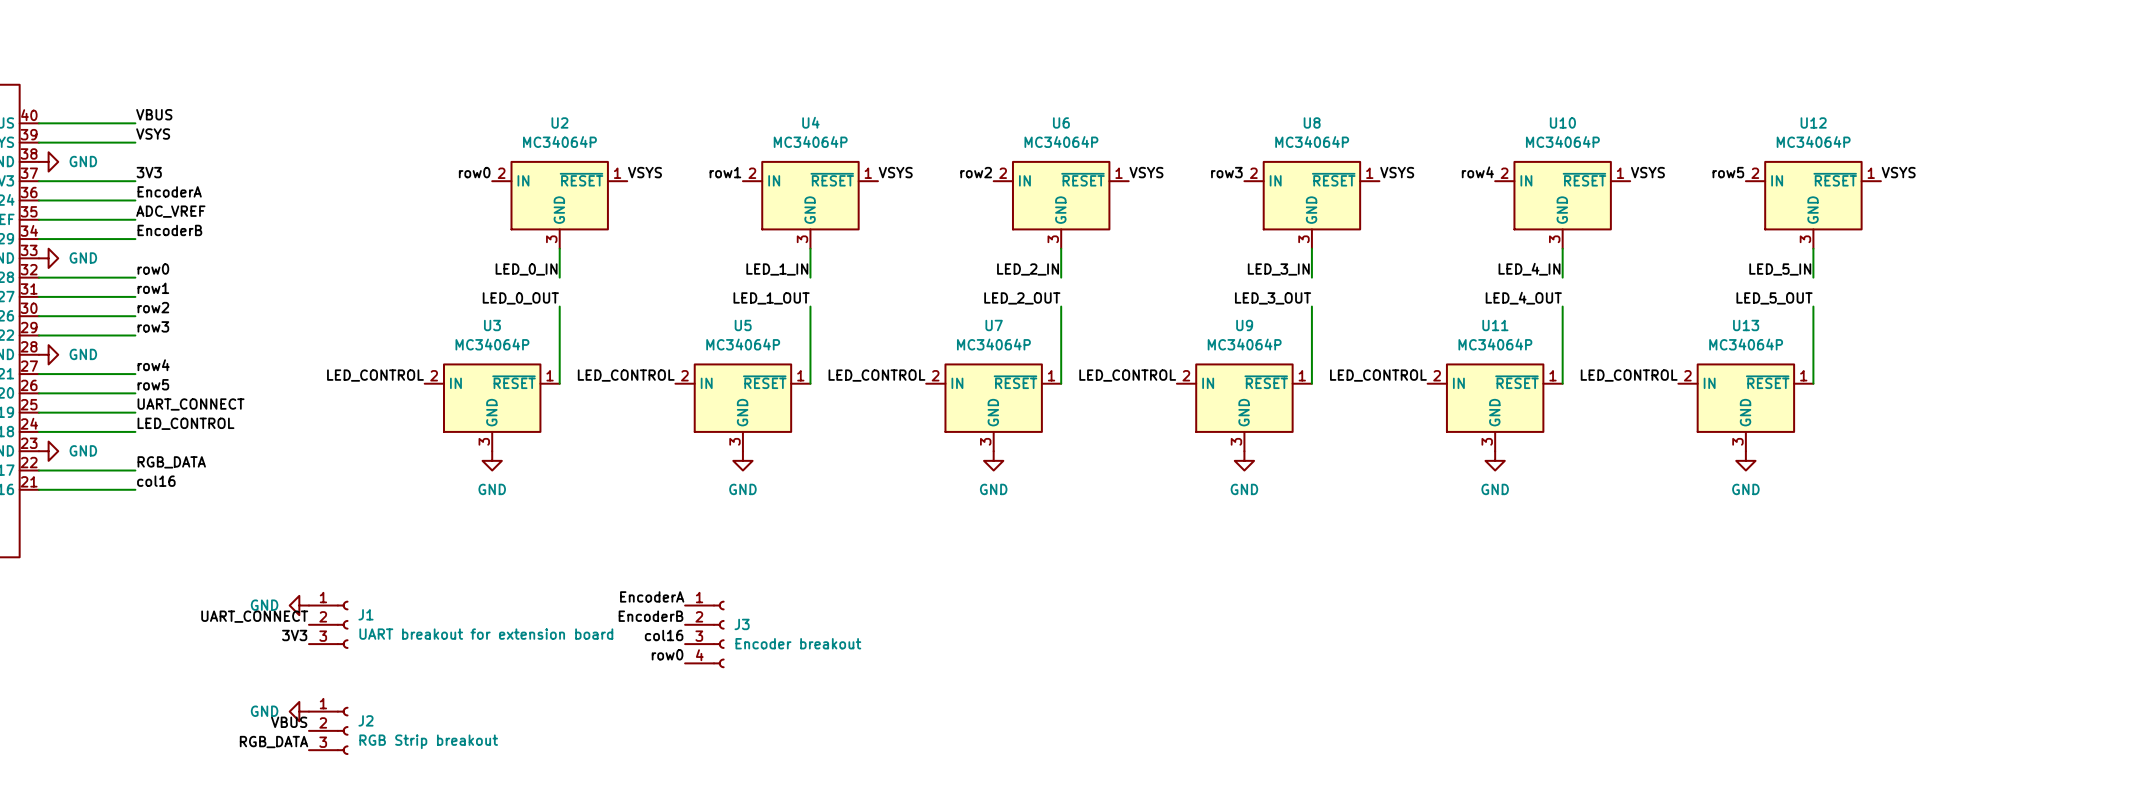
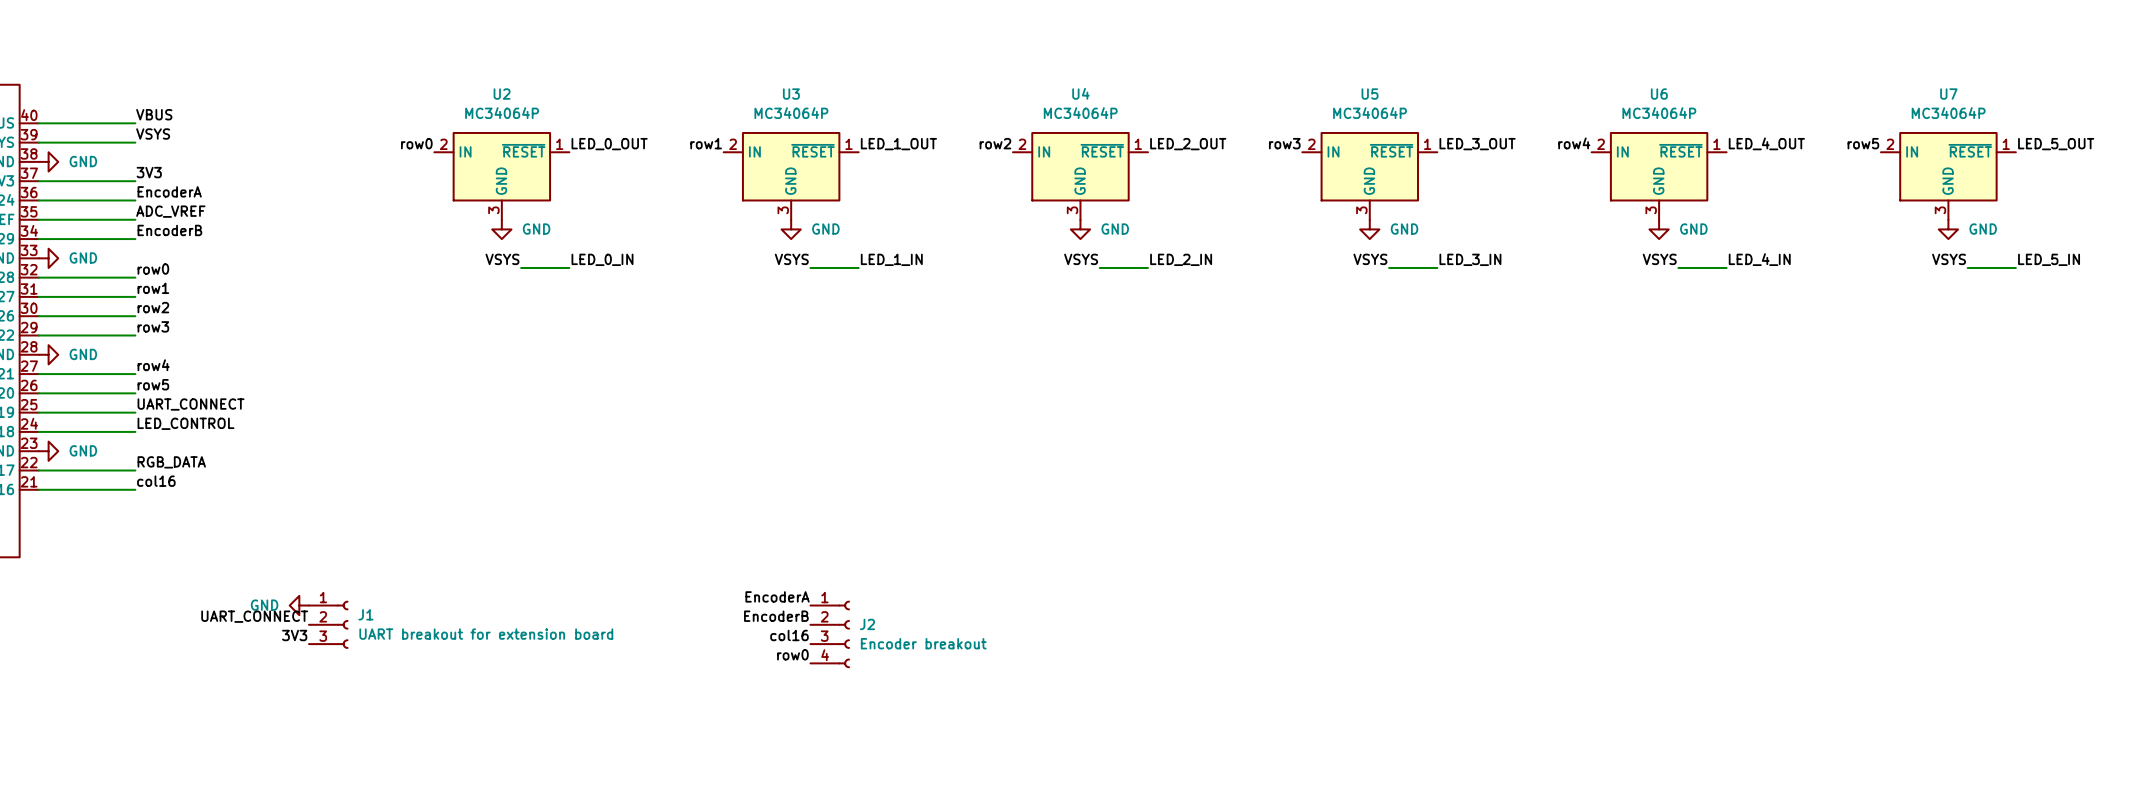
label: none -> LED_4_OUT (1766, 143)
label: none -> LED_3_OUT (1477, 144)
label: none -> LED_5_OUT (2056, 144)
label position: row0 (474, 172) -> row0 (416, 143)
label: VSYS (644, 172) -> none
label position: row1 (725, 172) -> row1 (706, 143)
label: VSYS (895, 172) -> none
label position: row2 (976, 172) -> row2 (995, 143)
label position: VSYS (1146, 172) -> VSYS (1081, 259)
label position: row3 (1226, 172) -> row3 (1284, 143)
label position: VSYS (1397, 172) -> VSYS (1370, 259)
label position: row4 (1477, 172) -> row4 (1574, 143)
label position: VSYS (1647, 172) -> VSYS (1659, 259)
label position: row5 (1728, 172) -> row5 (1863, 143)
label: VSYS (1898, 172) -> none
U2 position: (559, 204) -> (501, 175)
U4 position: (810, 204) -> (1080, 175)
U6 position: (1061, 204) -> (1659, 175)
U8: MC34064P (1311, 204) -> none
U10: MC34064P (1562, 204) -> none
U12: MC34064P (1813, 204) -> none
power symbol: none -> GND (501, 229)
power symbol: none -> GND (791, 229)
power symbol: none -> GND (1080, 229)
power symbol: none -> GND (1369, 229)
power symbol: none -> GND (1659, 229)
power symbol: none -> GND (1948, 229)
wire: (559, 248) (559, 277) -> none
wire: (810, 248) (810, 277) -> none
wire: (1061, 248) (1061, 277) -> none
wire: (1311, 248) (1311, 277) -> none
wire: (1562, 248) (1562, 277) -> none
wire: (1813, 248) (1813, 277) -> none
label: none -> VSYS (502, 259)
label: none -> VSYS (791, 259)
label: none -> VSYS (1949, 259)
label: none -> LED_5_IN (2049, 259)
wire: none -> (521, 267) (569, 267)
wire: none -> (810, 267) (858, 267)
wire: none -> (1099, 267) (1147, 267)
wire: none -> (1389, 267) (1437, 267)
wire: none -> (1678, 267) (1726, 267)
wire: none -> (1967, 267) (2015, 267)
label position: LED_0_IN (526, 269) -> LED_0_IN (602, 259)
label position: LED_1_IN (777, 269) -> LED_1_IN (891, 259)
label position: LED_2_IN (1028, 269) -> LED_2_IN (1181, 259)
label position: LED_3_IN (1278, 269) -> LED_3_IN (1470, 259)
label position: LED_4_IN (1529, 269) -> LED_4_IN (1759, 259)
label: LED_5_IN (1780, 269) -> none
label position: LED_0_OUT (520, 298) -> LED_0_OUT (609, 144)
label position: LED_1_OUT (771, 298) -> LED_1_OUT (898, 144)
label position: LED_2_OUT (1022, 298) -> LED_2_OUT (1188, 144)
label: LED_3_OUT (1273, 298) -> none
label: LED_4_OUT (1523, 298) -> none
label: LED_5_OUT (1774, 298) -> none
wire: (559, 306) (559, 383) -> none
wire: (810, 306) (810, 383) -> none
wire: (1061, 306) (1061, 383) -> none
wire: (1311, 306) (1311, 383) -> none
wire: (1562, 306) (1562, 383) -> none
wire: (1813, 306) (1813, 383) -> none
label: LED_CONTROL (375, 375) -> none
label: LED_CONTROL (626, 375) -> none
label: LED_CONTROL (876, 375) -> none
label: LED_CONTROL (1127, 375) -> none
label: LED_CONTROL (1378, 375) -> none
label: LED_CONTROL (1629, 375) -> none
U3 position: (492, 407) -> (791, 175)
U5 position: (742, 407) -> (1369, 175)
U7 position: (993, 407) -> (1948, 175)
U9: MC34064P (1244, 407) -> none
U11: MC34064P (1495, 407) -> none
U13: MC34064P (1745, 407) -> none
power symbol: GND (492, 460) -> none
power symbol: GND (742, 460) -> none
power symbol: GND (993, 460) -> none
power symbol: GND (1244, 460) -> none
power symbol: GND (1495, 460) -> none
power symbol: GND (1745, 460) -> none
label position: EncoderA (652, 596) -> EncoderA (777, 596)
label position: EncoderB (651, 616) -> EncoderB (776, 616)
J3: Encoder breakout (704, 634) -> none
label position: col16 (664, 635) -> col16 (789, 635)
label position: row0 (667, 654) -> row0 (792, 654)
J2 symbol: [308, 707, 349, 755] -> [810, 601, 850, 668]
power symbol: GND (299, 711) -> none
label: VBUS (289, 722) -> none
J2 value: RGB Strip breakout (428, 741) -> Encoder breakout (923, 643)
label: RGB_DATA (274, 742) -> none

